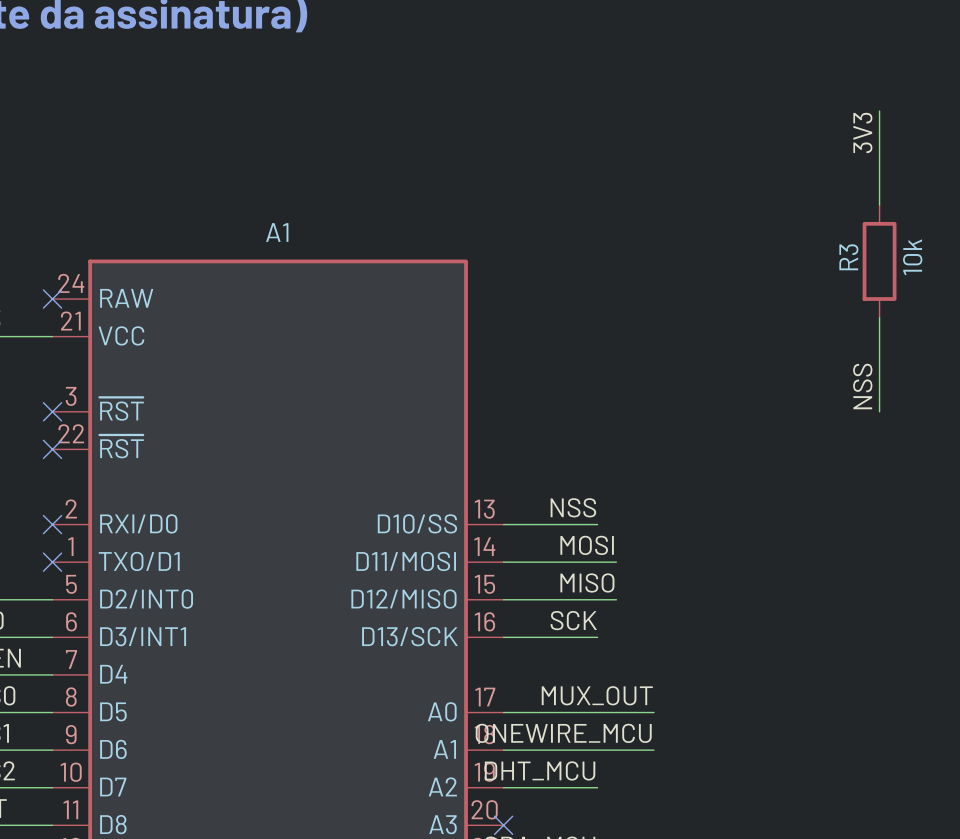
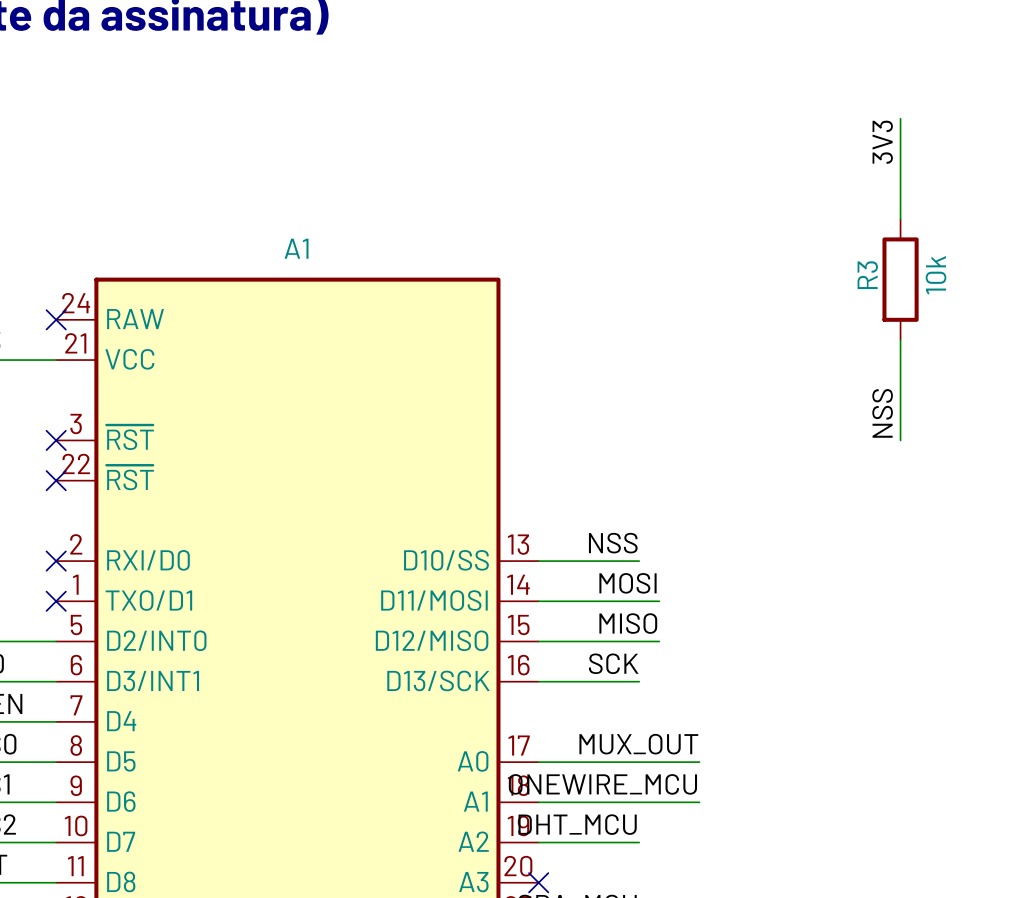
wire: (879, 111) (879, 205) -> (900, 118) (900, 219)
label position: 3V3 (862, 133) -> 3V3 (882, 142)
R3 position: (879, 261) -> (900, 279)
wire: (879, 317) (879, 411) -> (900, 339) (900, 440)
label position: NSS (862, 386) -> NSS (882, 413)

